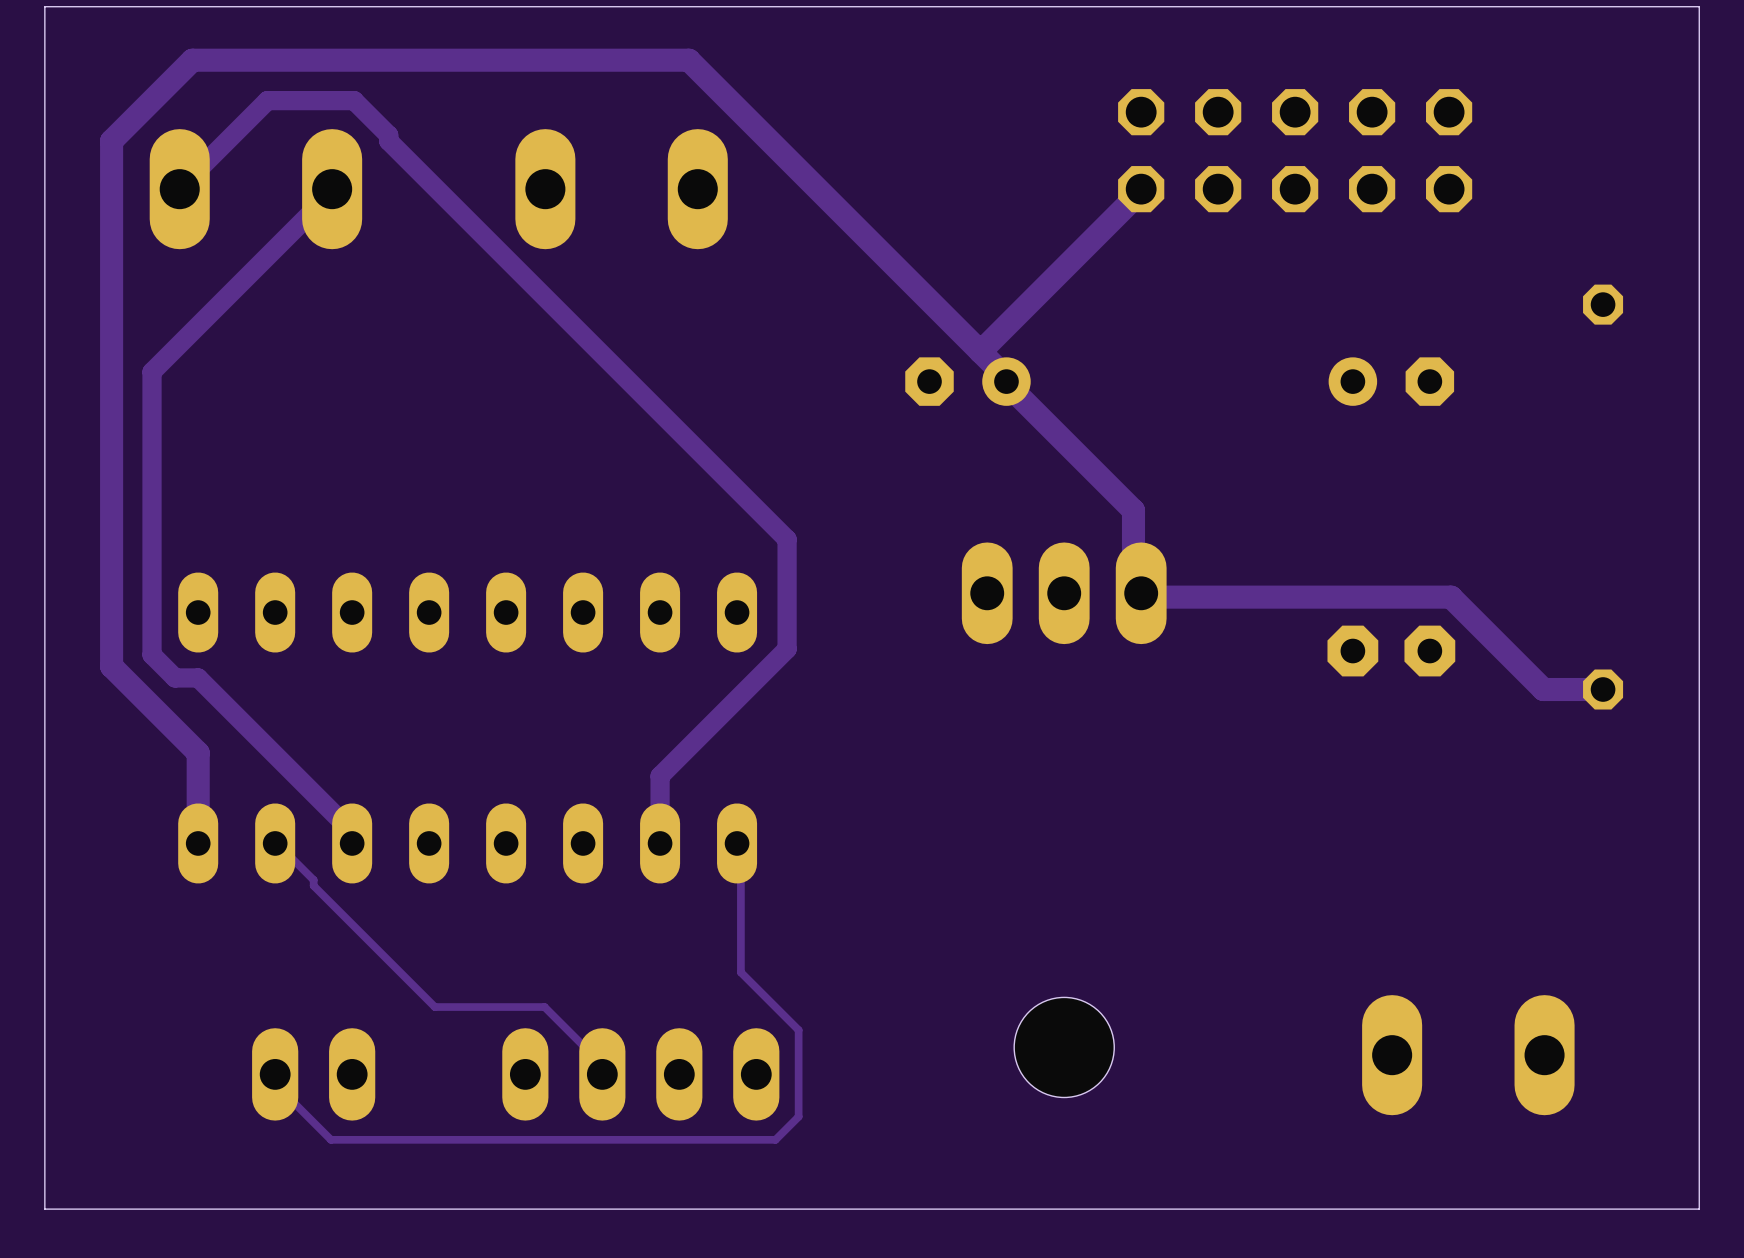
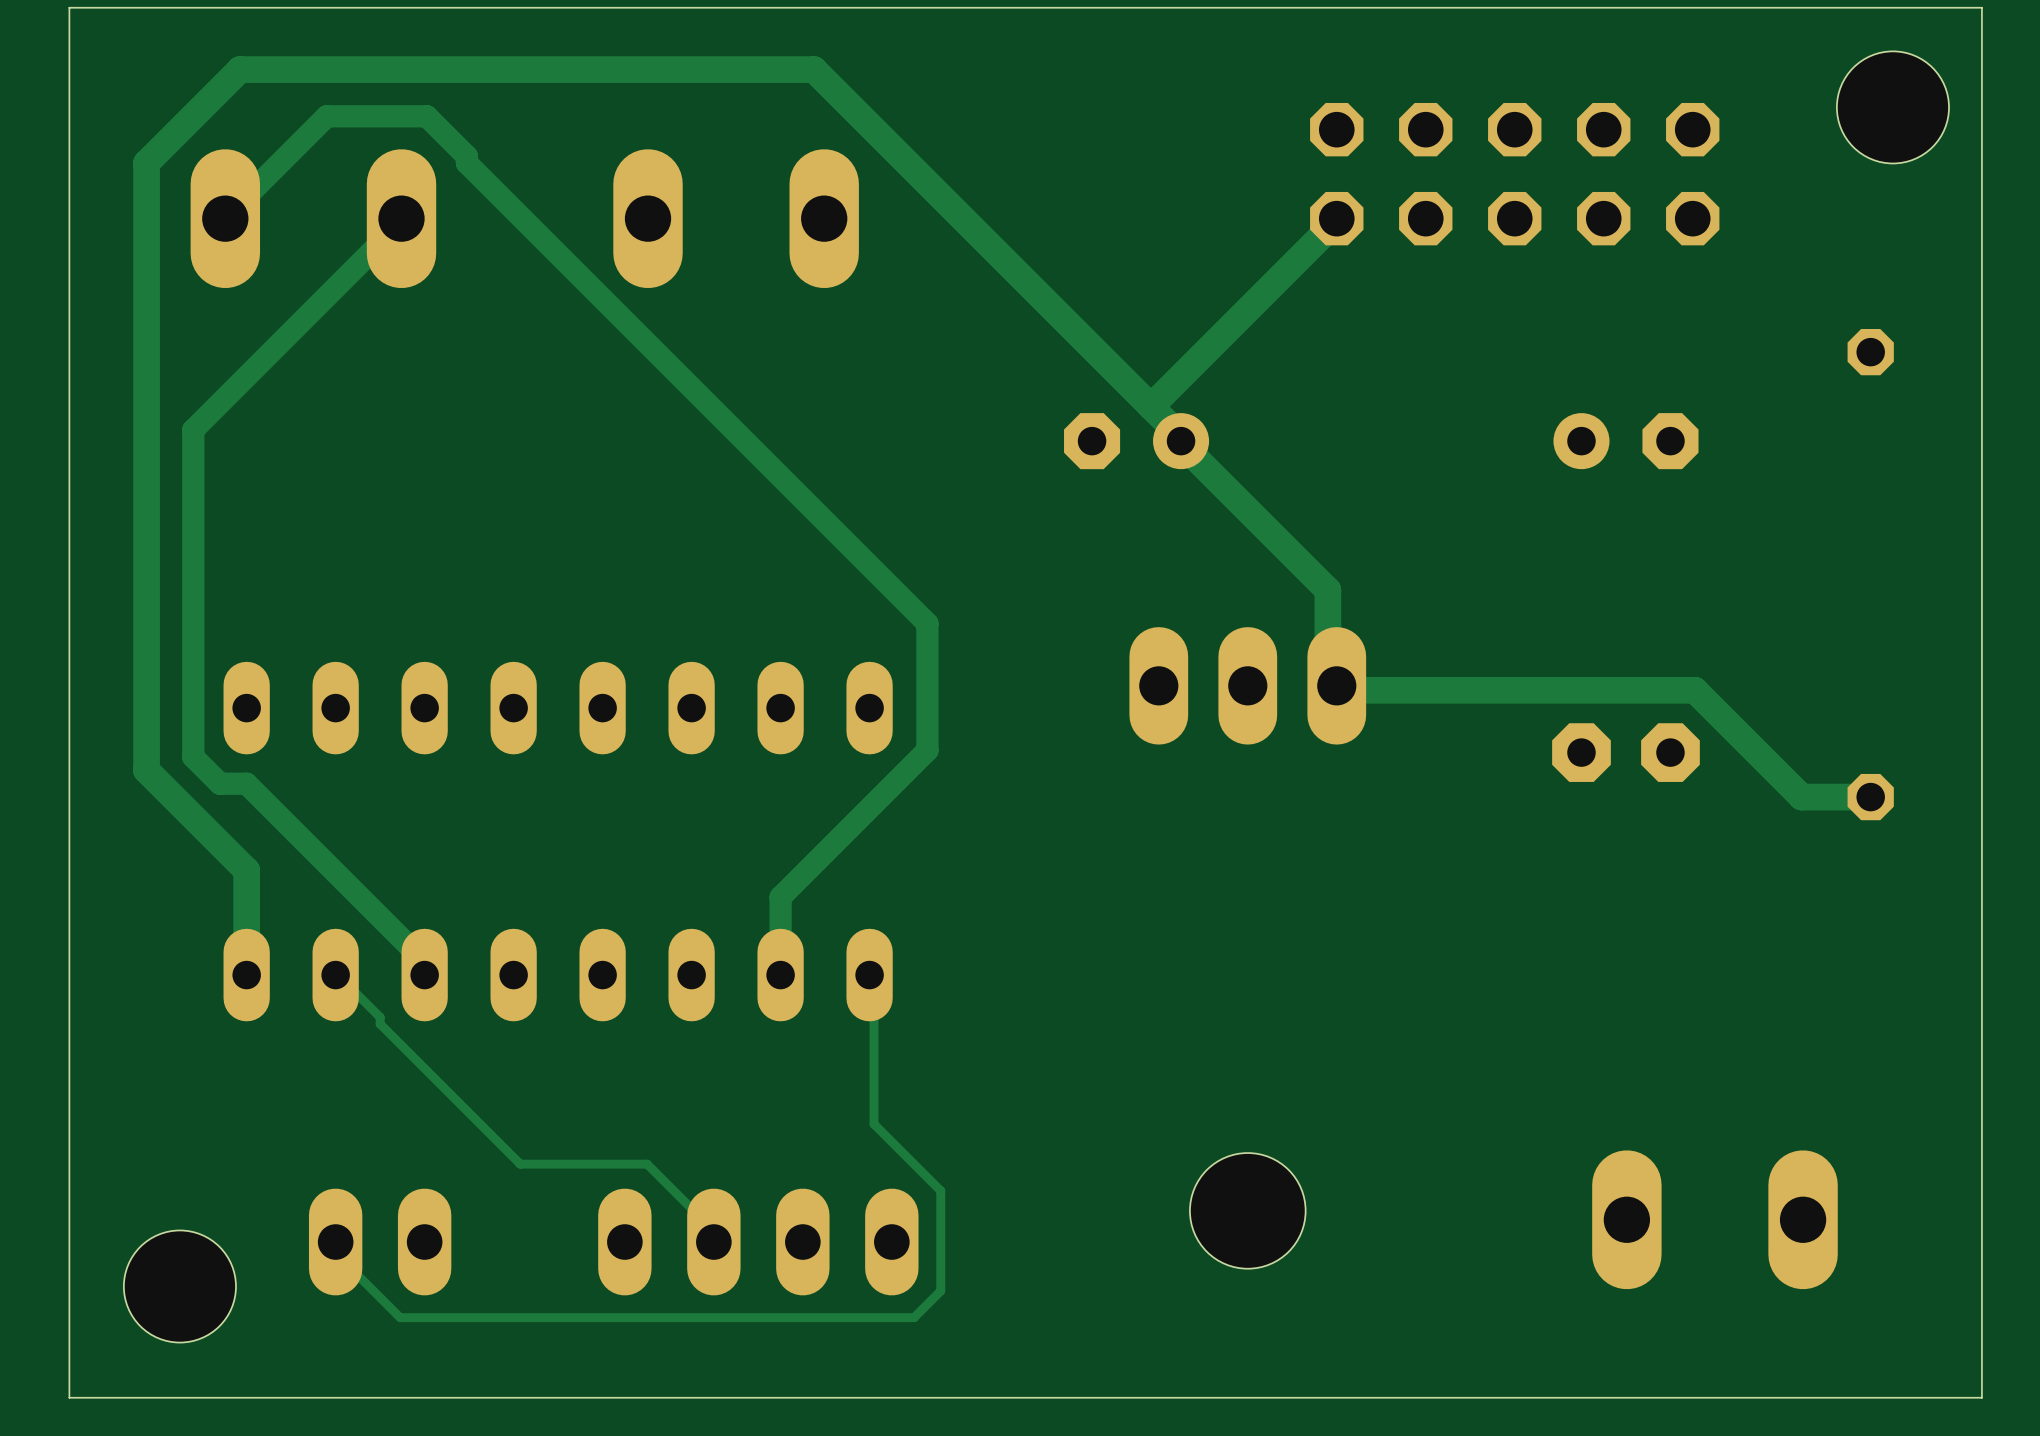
hole: none -> (1892, 107)
hole: none -> (179, 1286)

